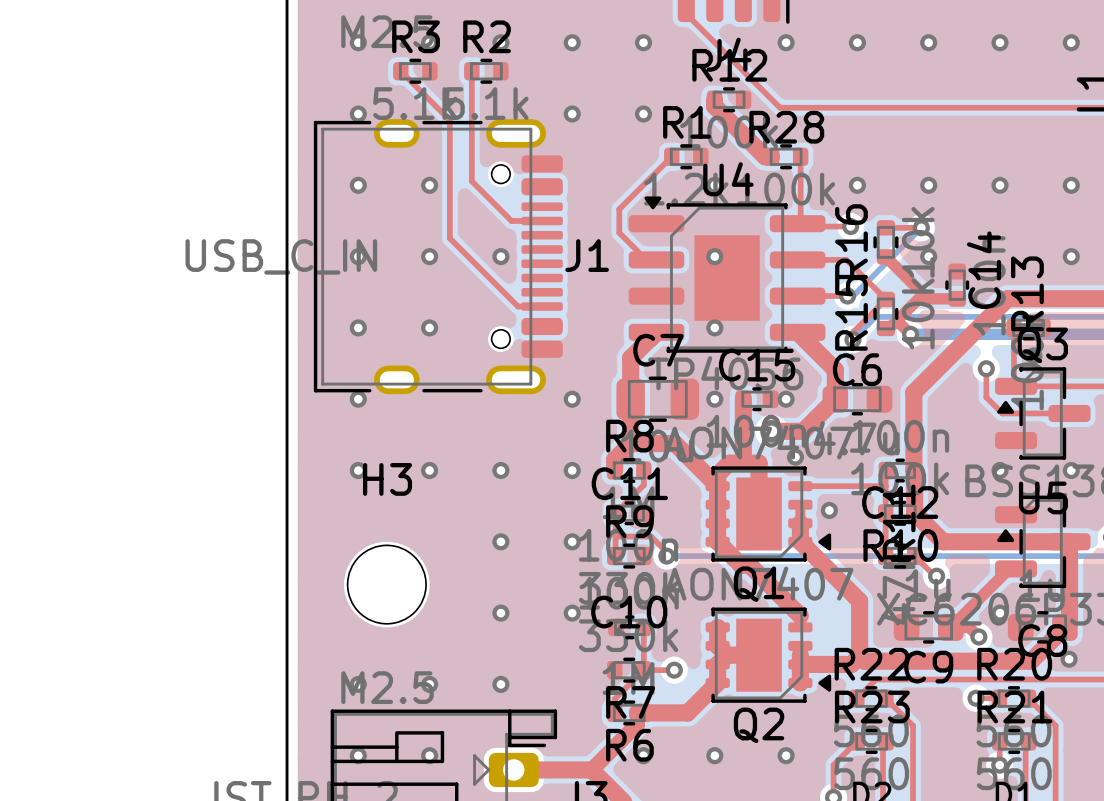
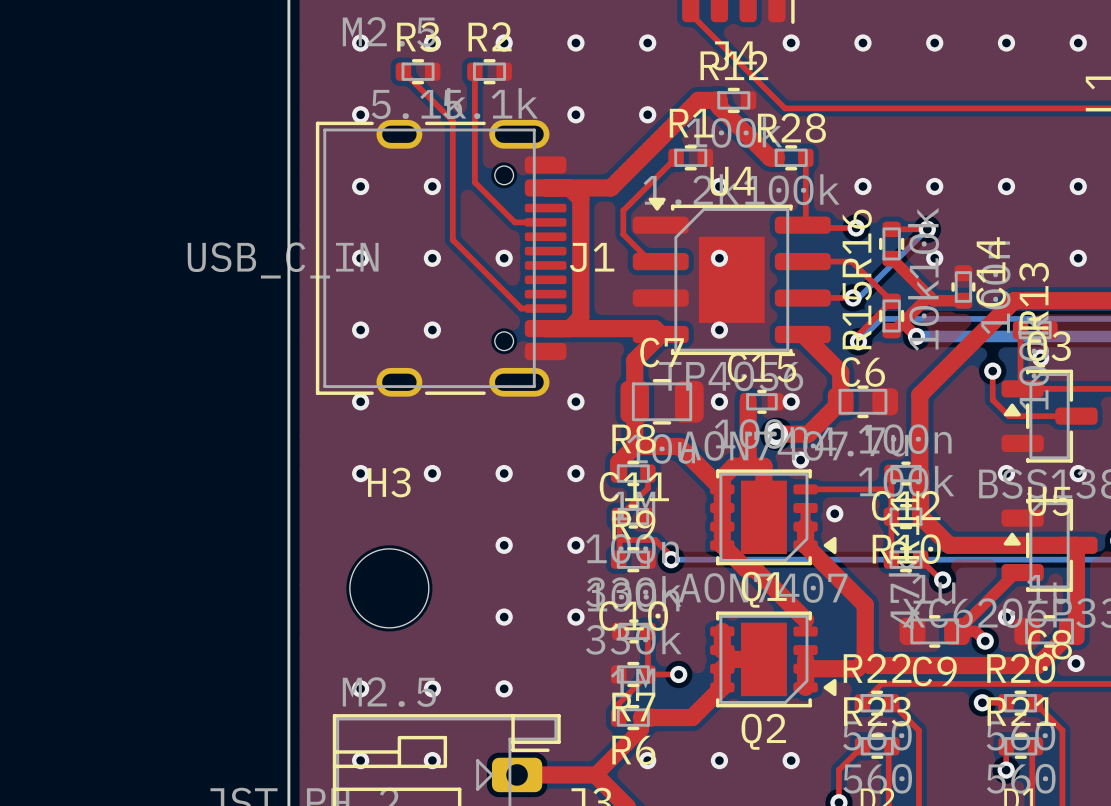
top track: none -> (719, 100) (698, 100) (610, 187) (545, 187)
top track: none -> (569, 187) (580, 199) (580, 317) (569, 328)
top track: none -> (545, 328) (654, 328) (660, 334)

